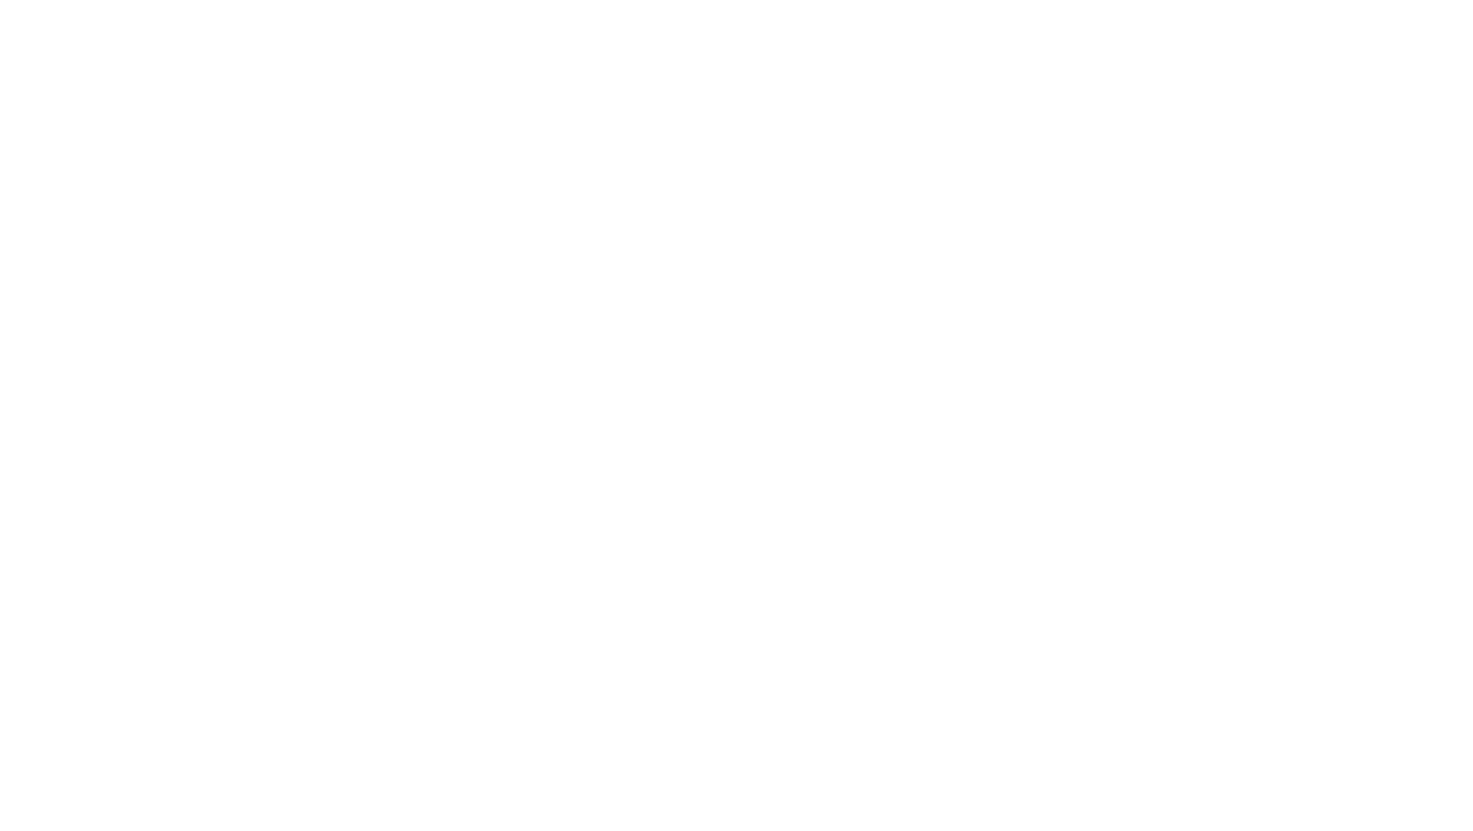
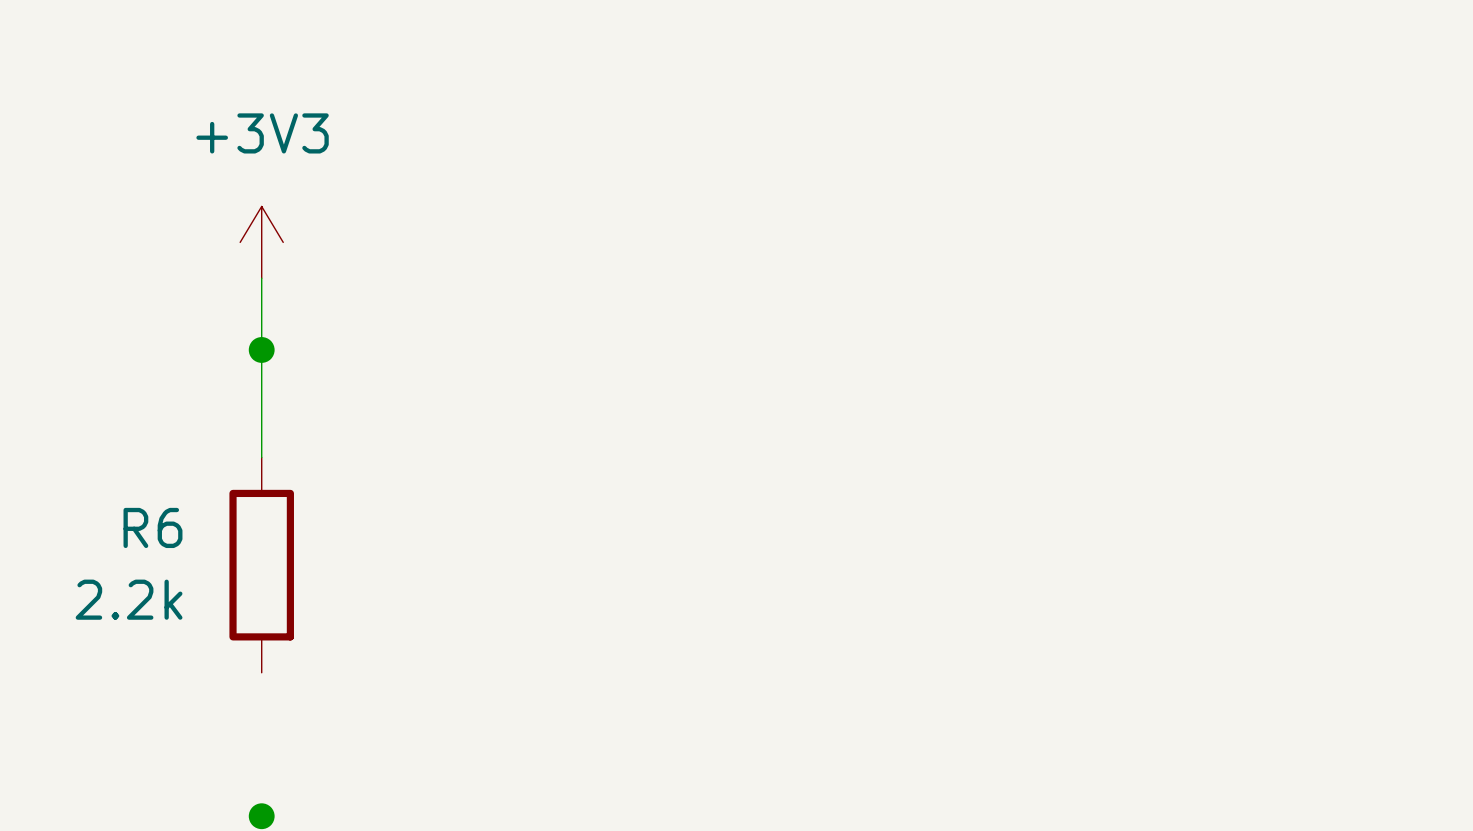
power symbol: none -> +3V3 (261, 242)
wire: none -> (261, 278) (261, 457)
junction: none -> (261, 349)
R6: none -> 2.2k (261, 565)
junction: none -> (261, 816)

